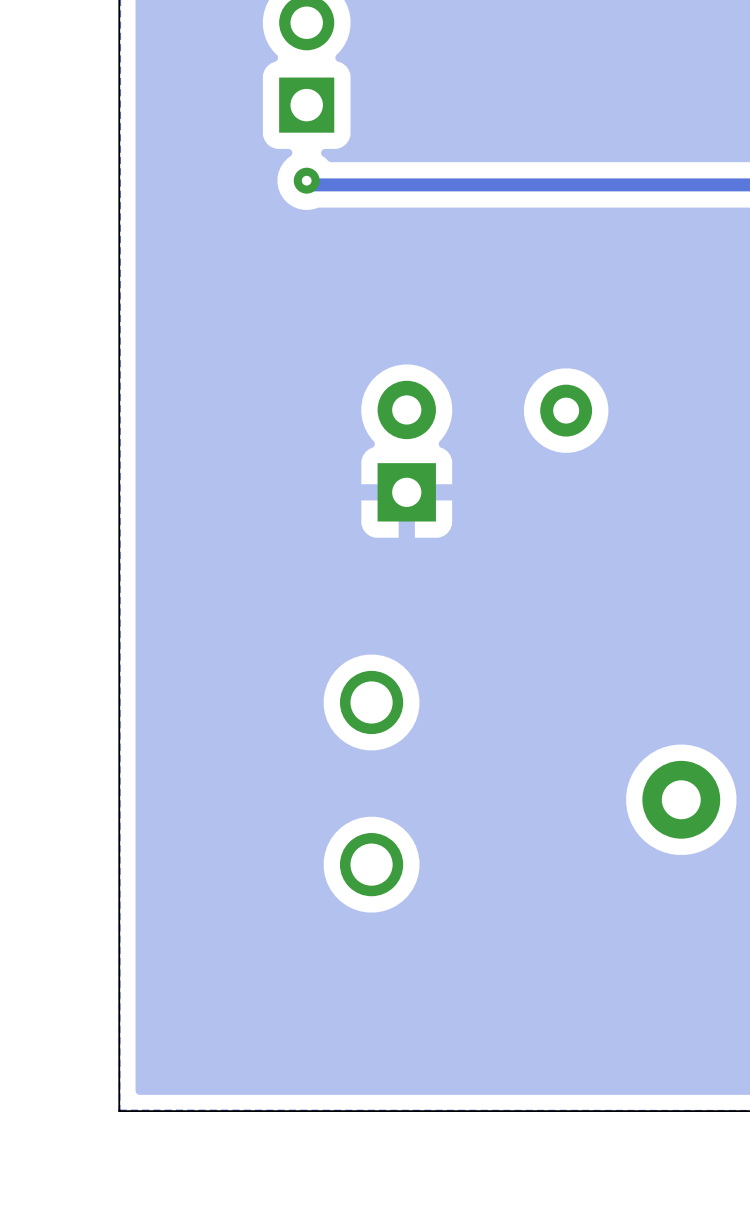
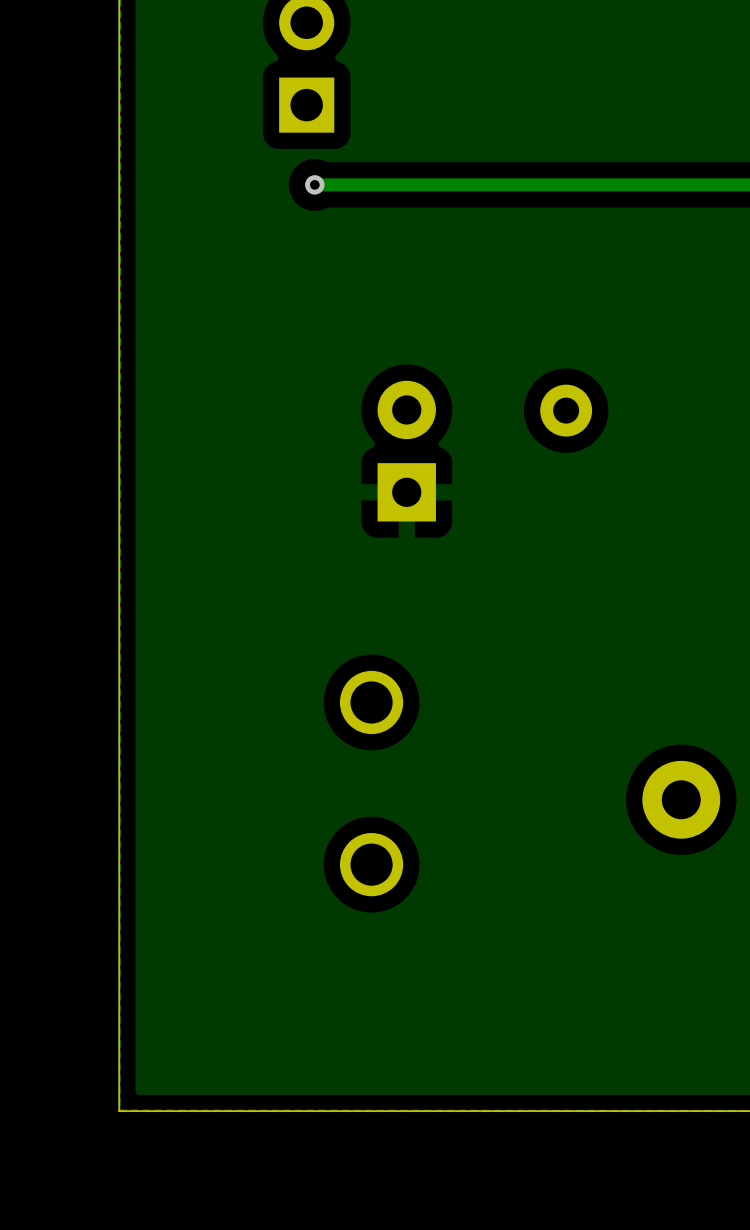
via size: [293, 167, 320, 194] -> [305, 175, 325, 195]

